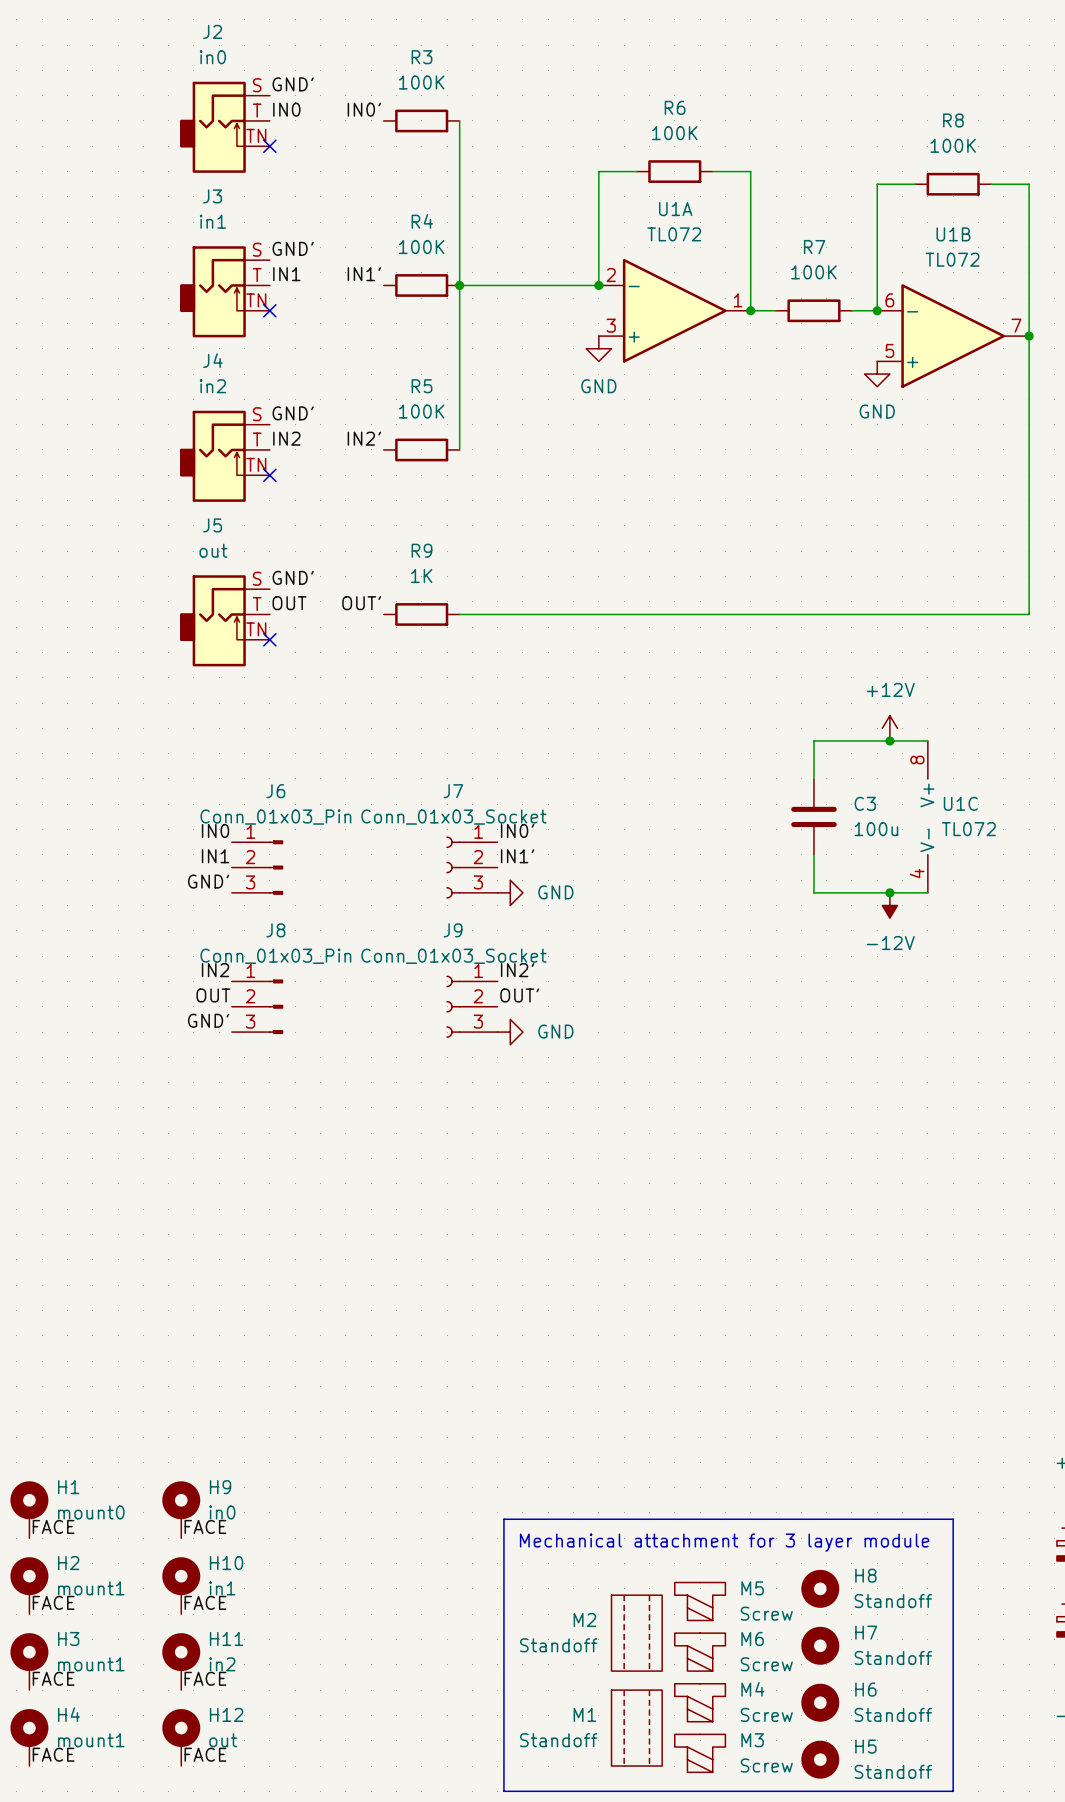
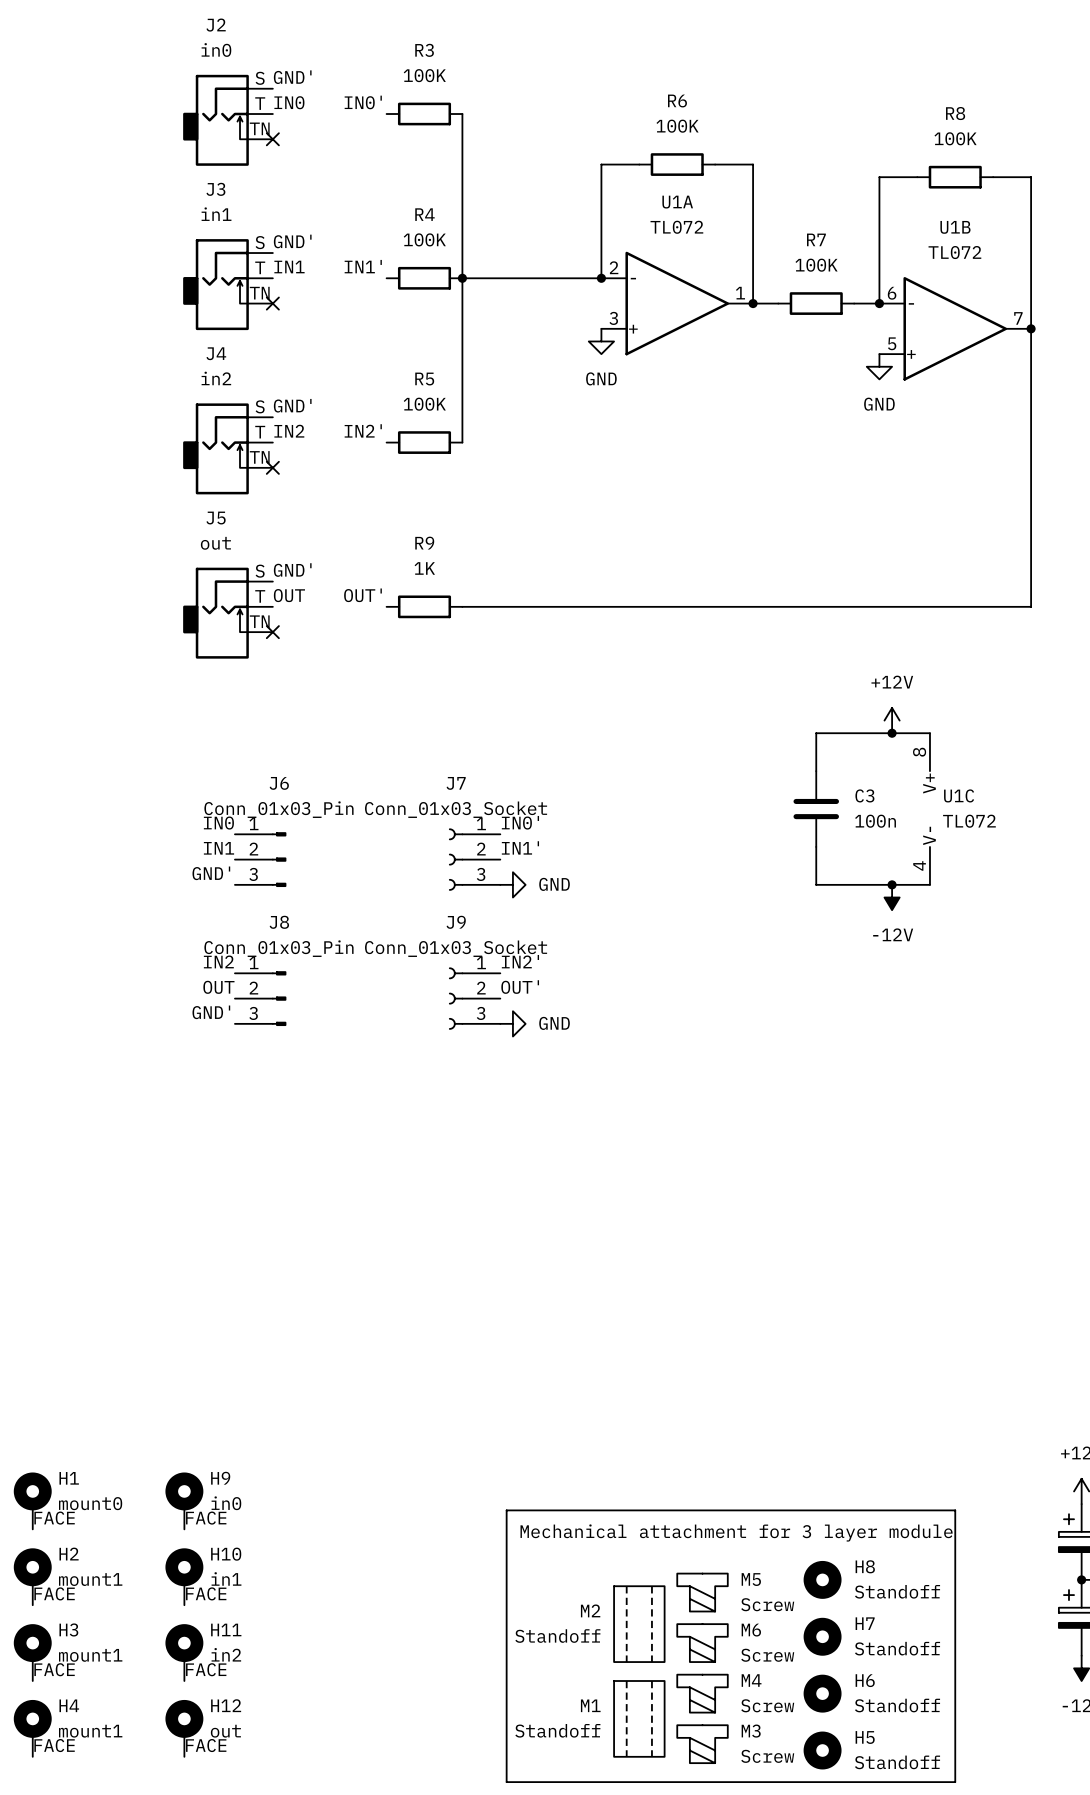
C3 value: 100u (876, 829) -> 100n (875, 821)

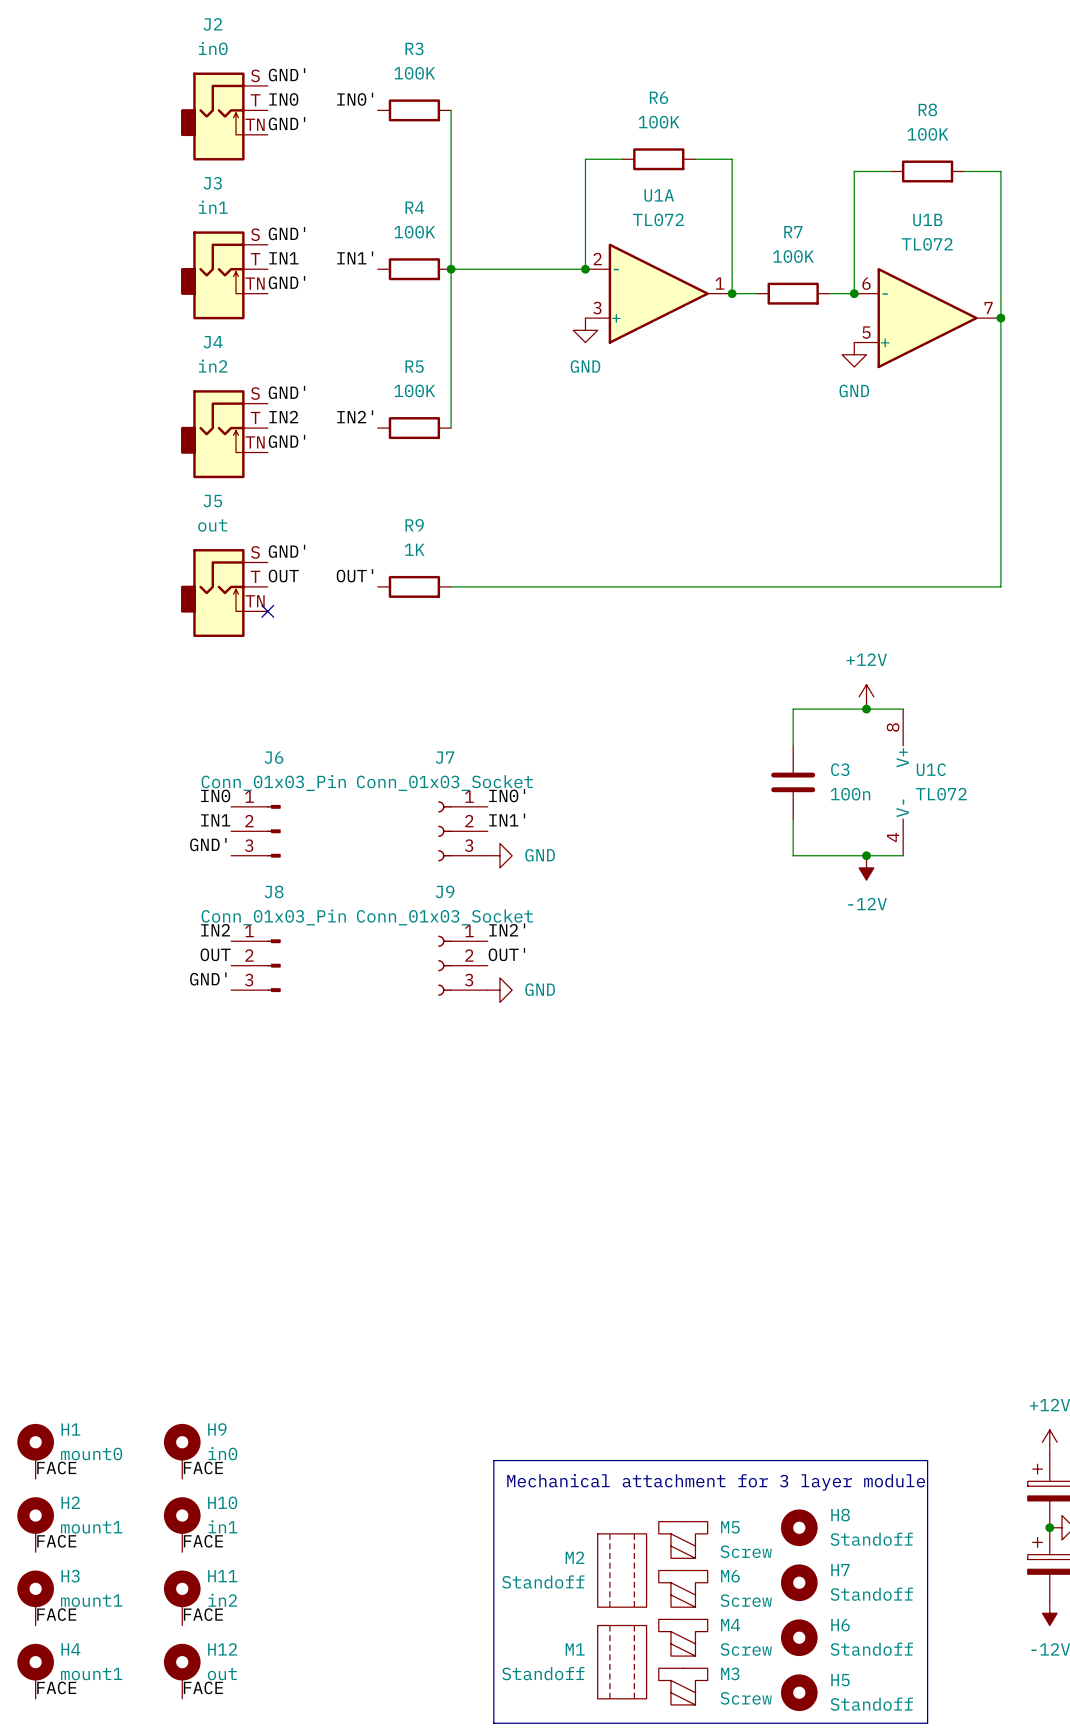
label: none -> GND' (286, 123)
no-connect mark: (272, 139) -> none
label: none -> GND' (286, 282)
no-connect mark: (272, 303) -> none
label: none -> GND' (286, 441)
no-connect mark: (272, 467) -> none

